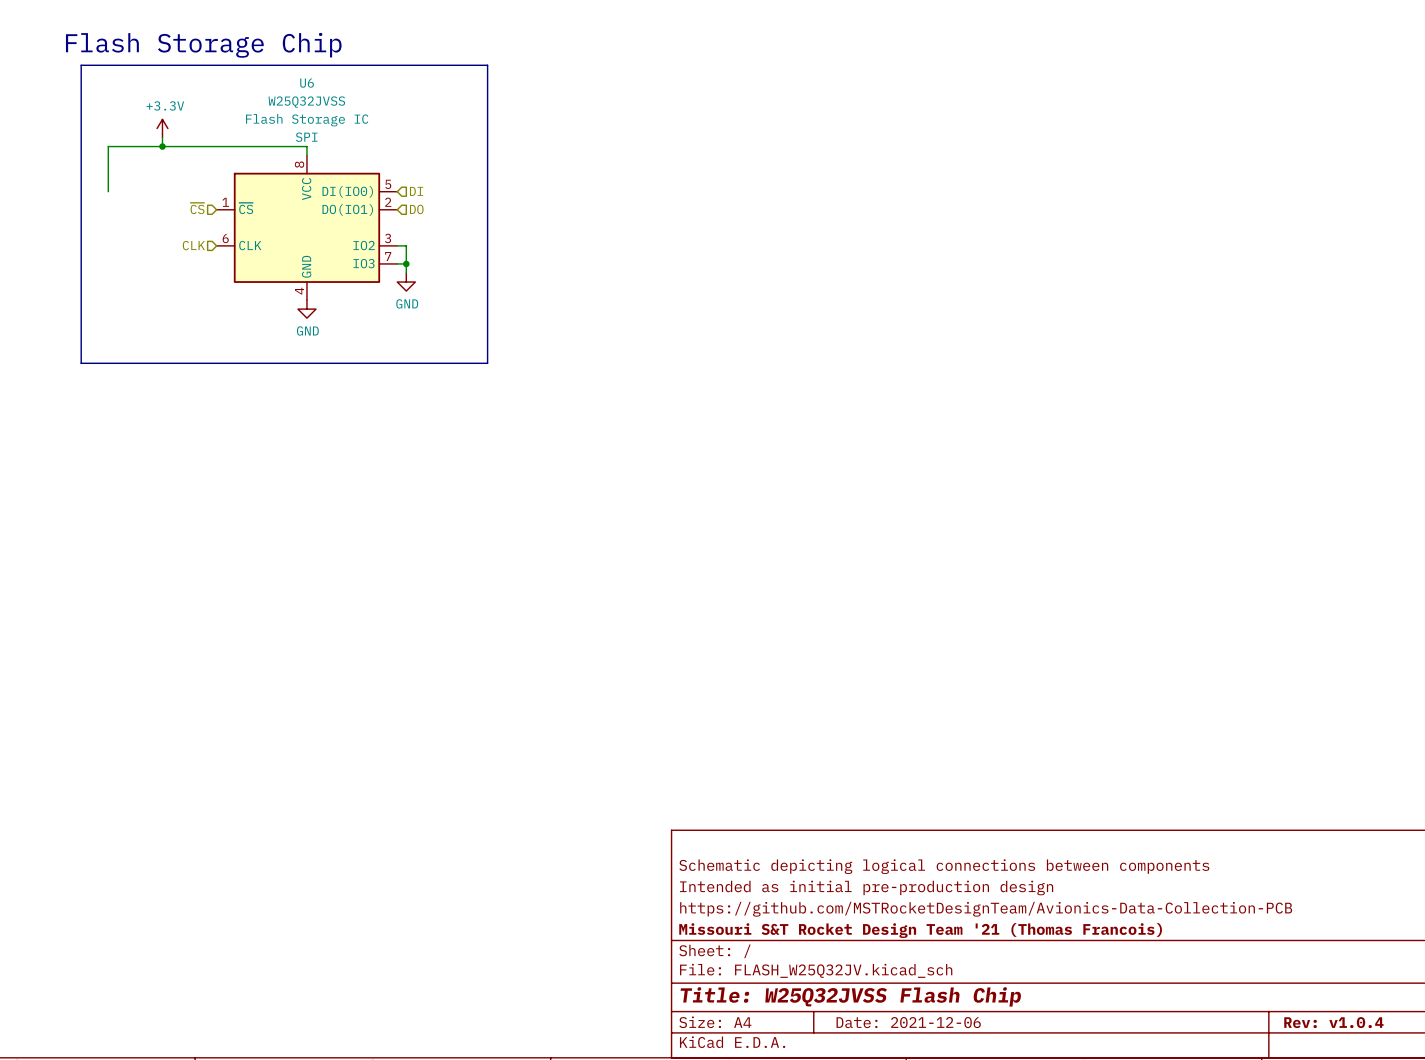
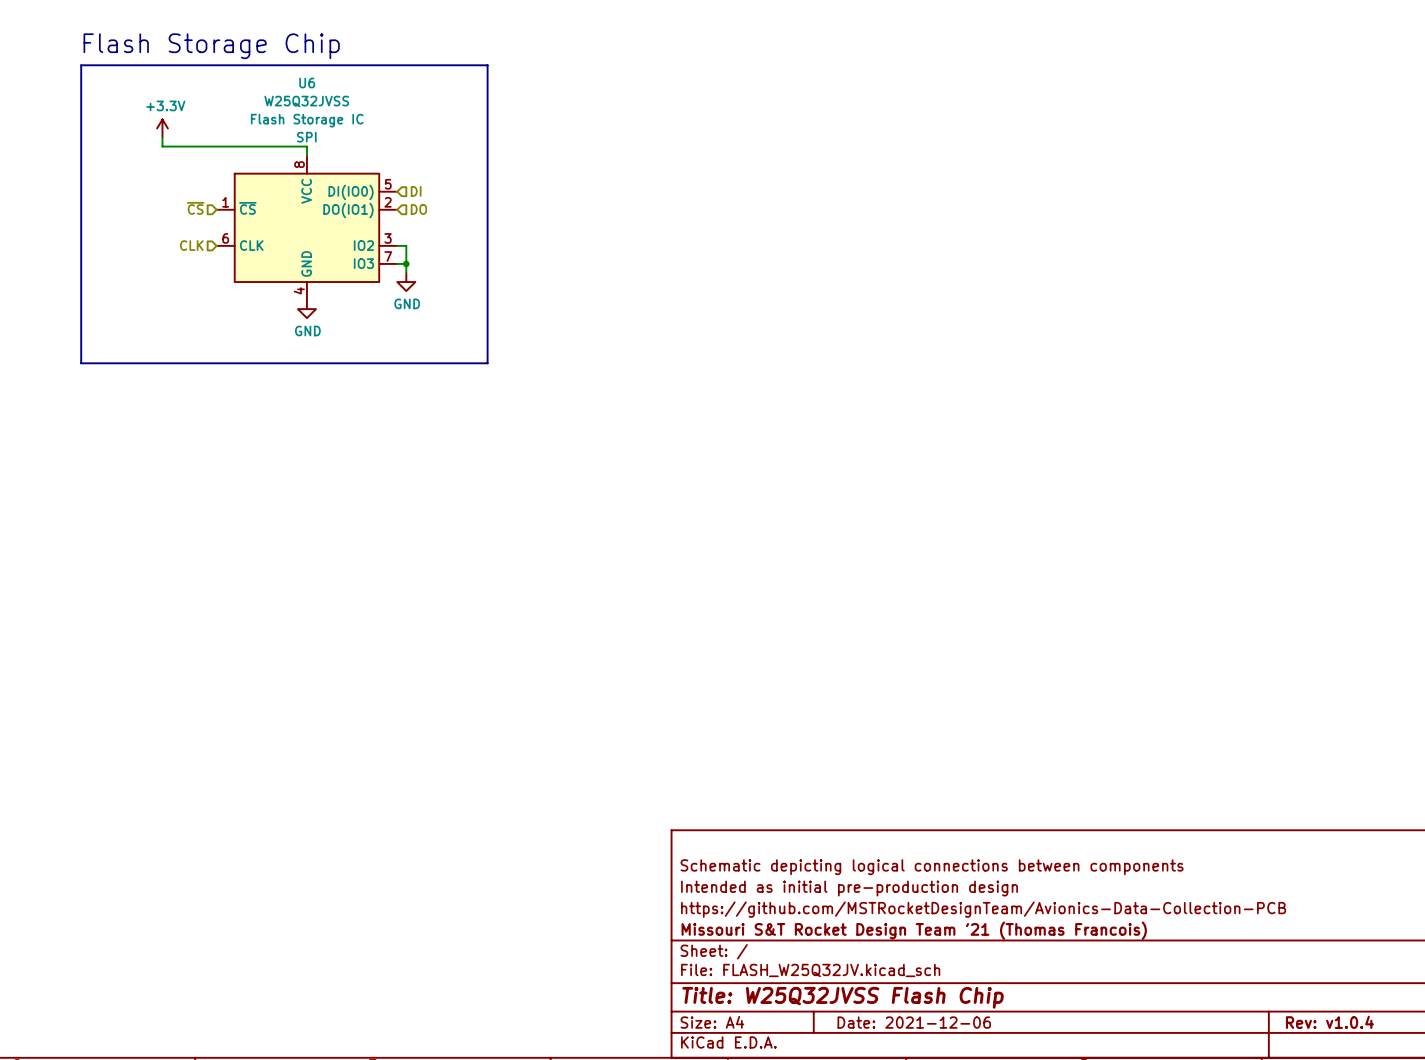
wire: (162, 146) (108, 146) (108, 191) -> none
junction: (162, 146) -> none

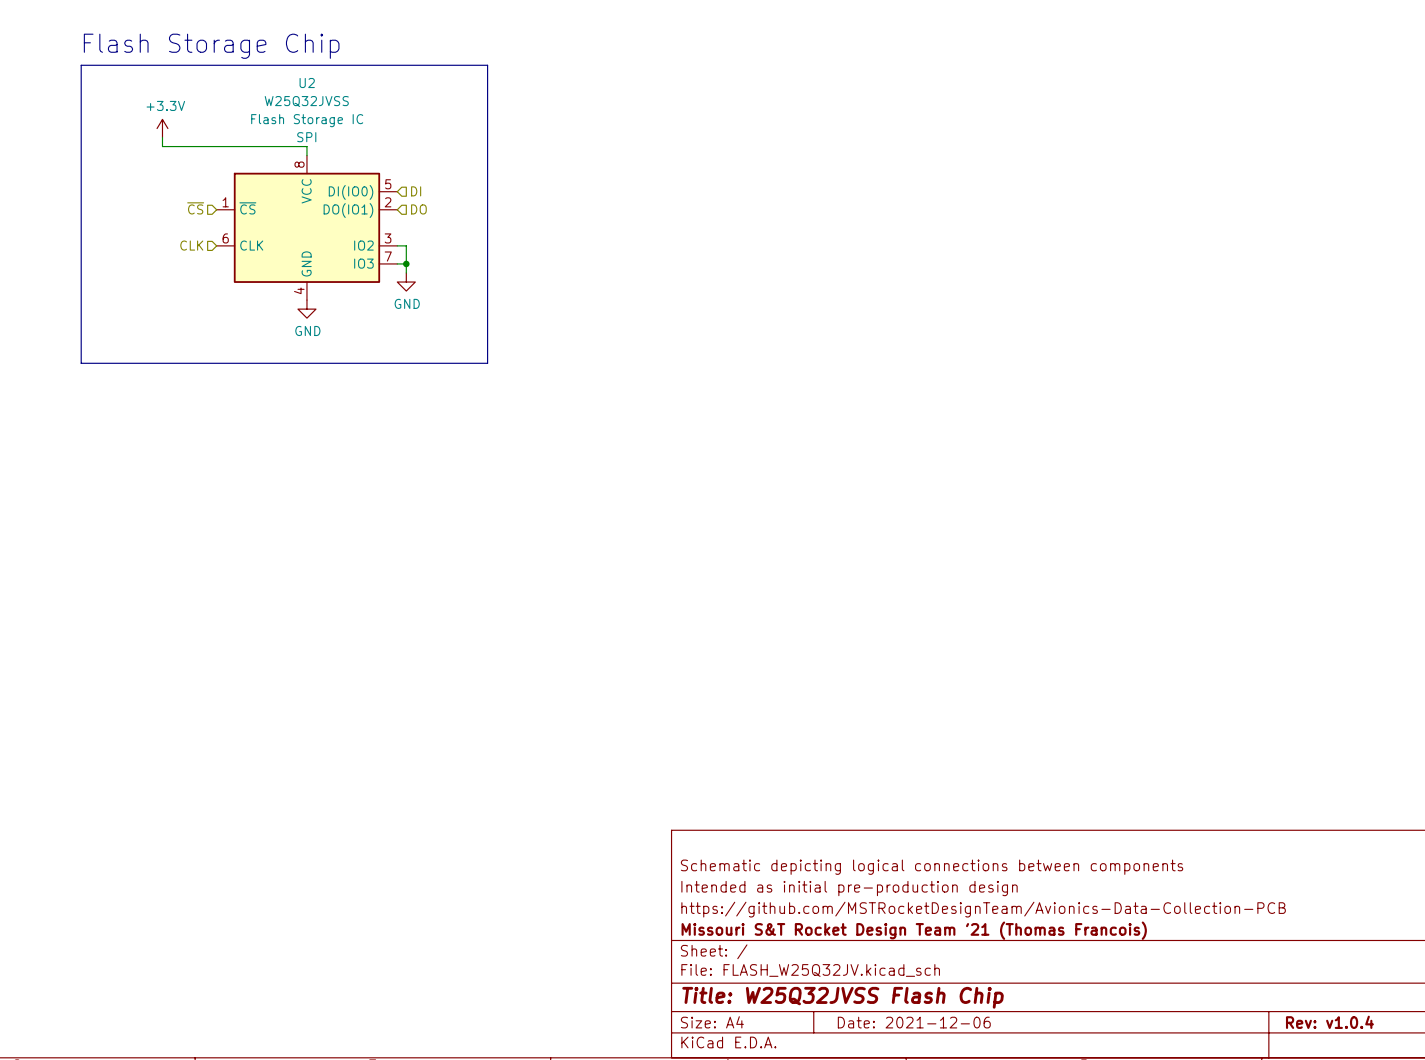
U6 name: U6 (307, 83) -> U2 (307, 83)

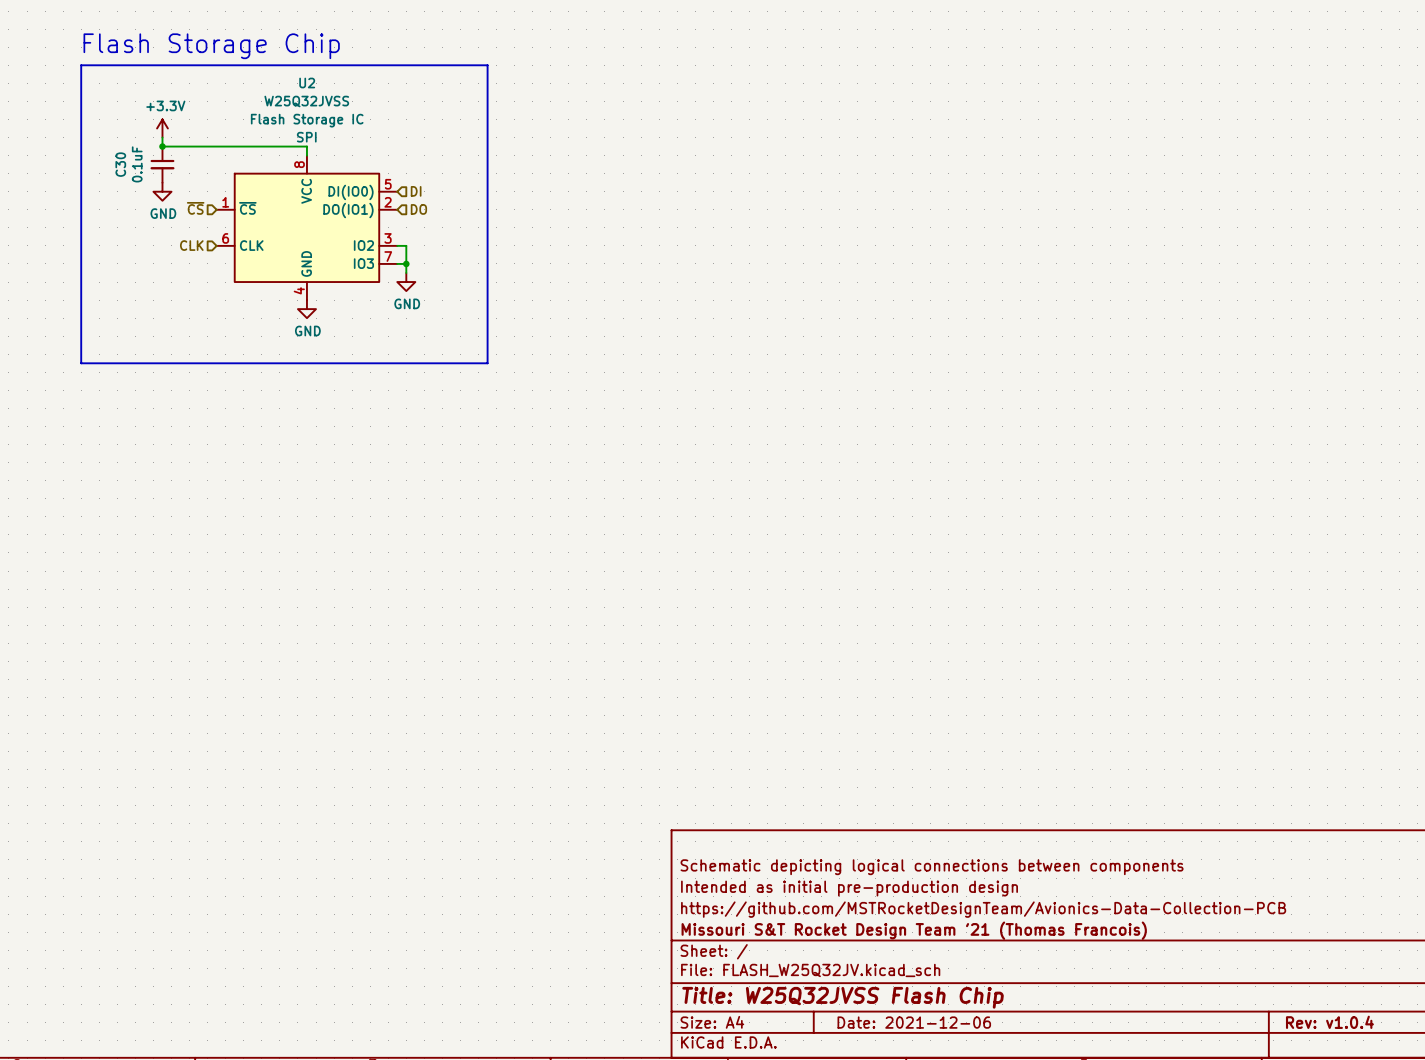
junction: none -> (162, 146)
C30: none -> 0.1uF (162, 164)
power symbol: none -> GND (162, 191)

